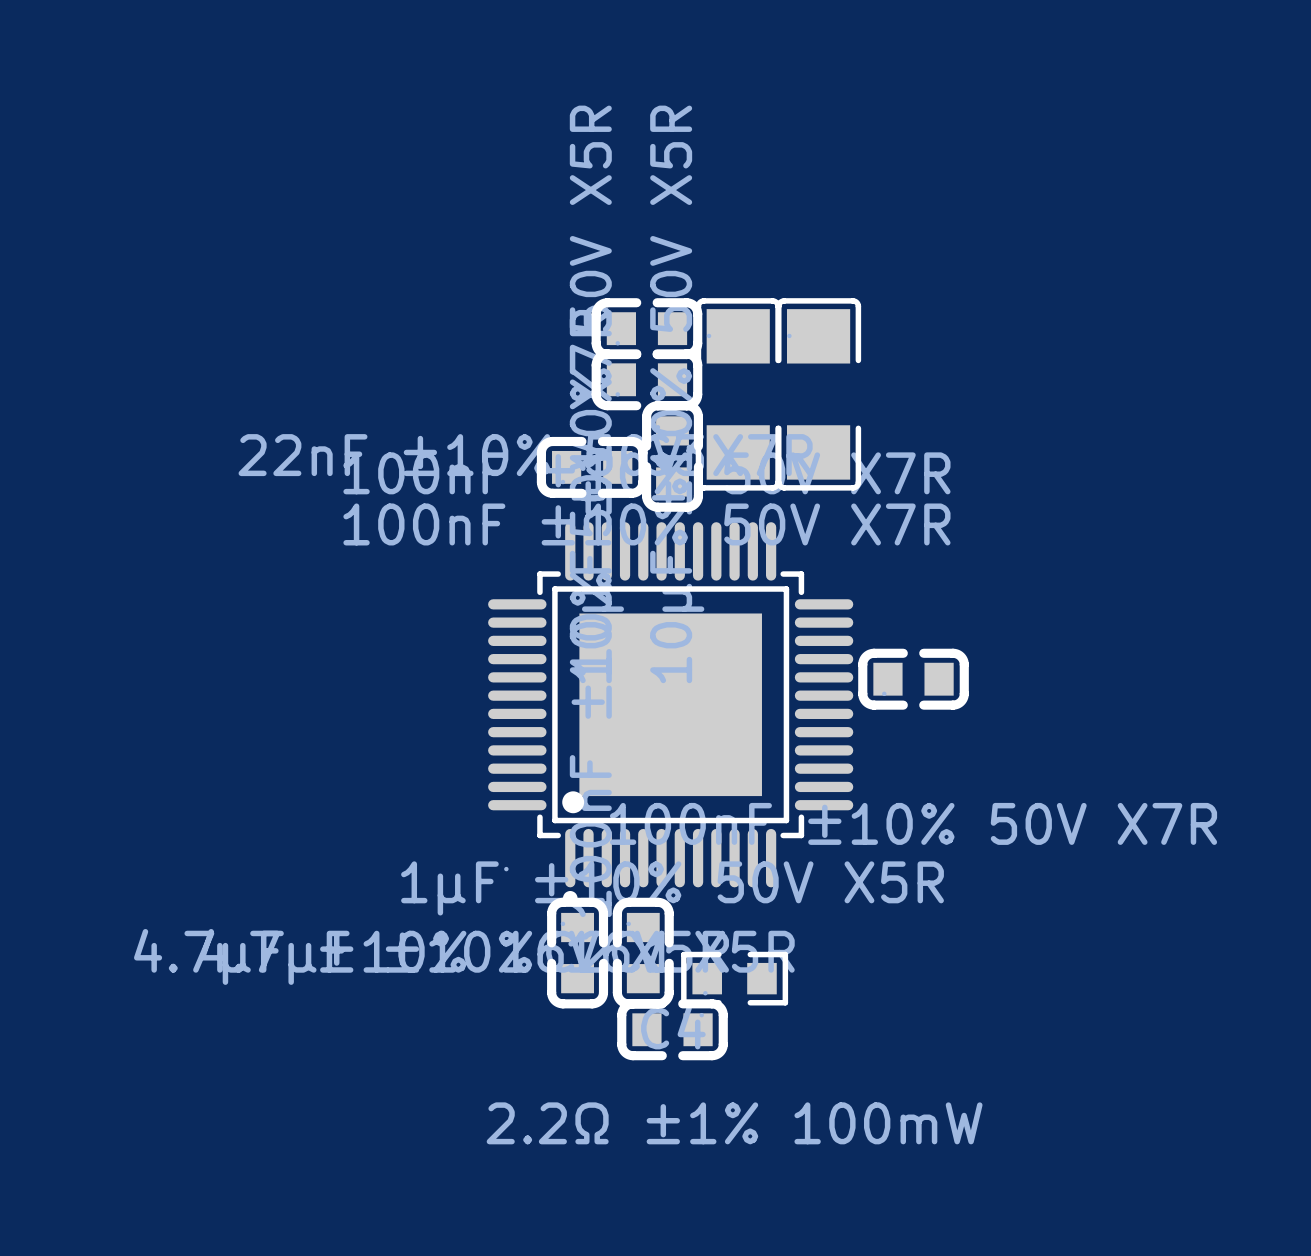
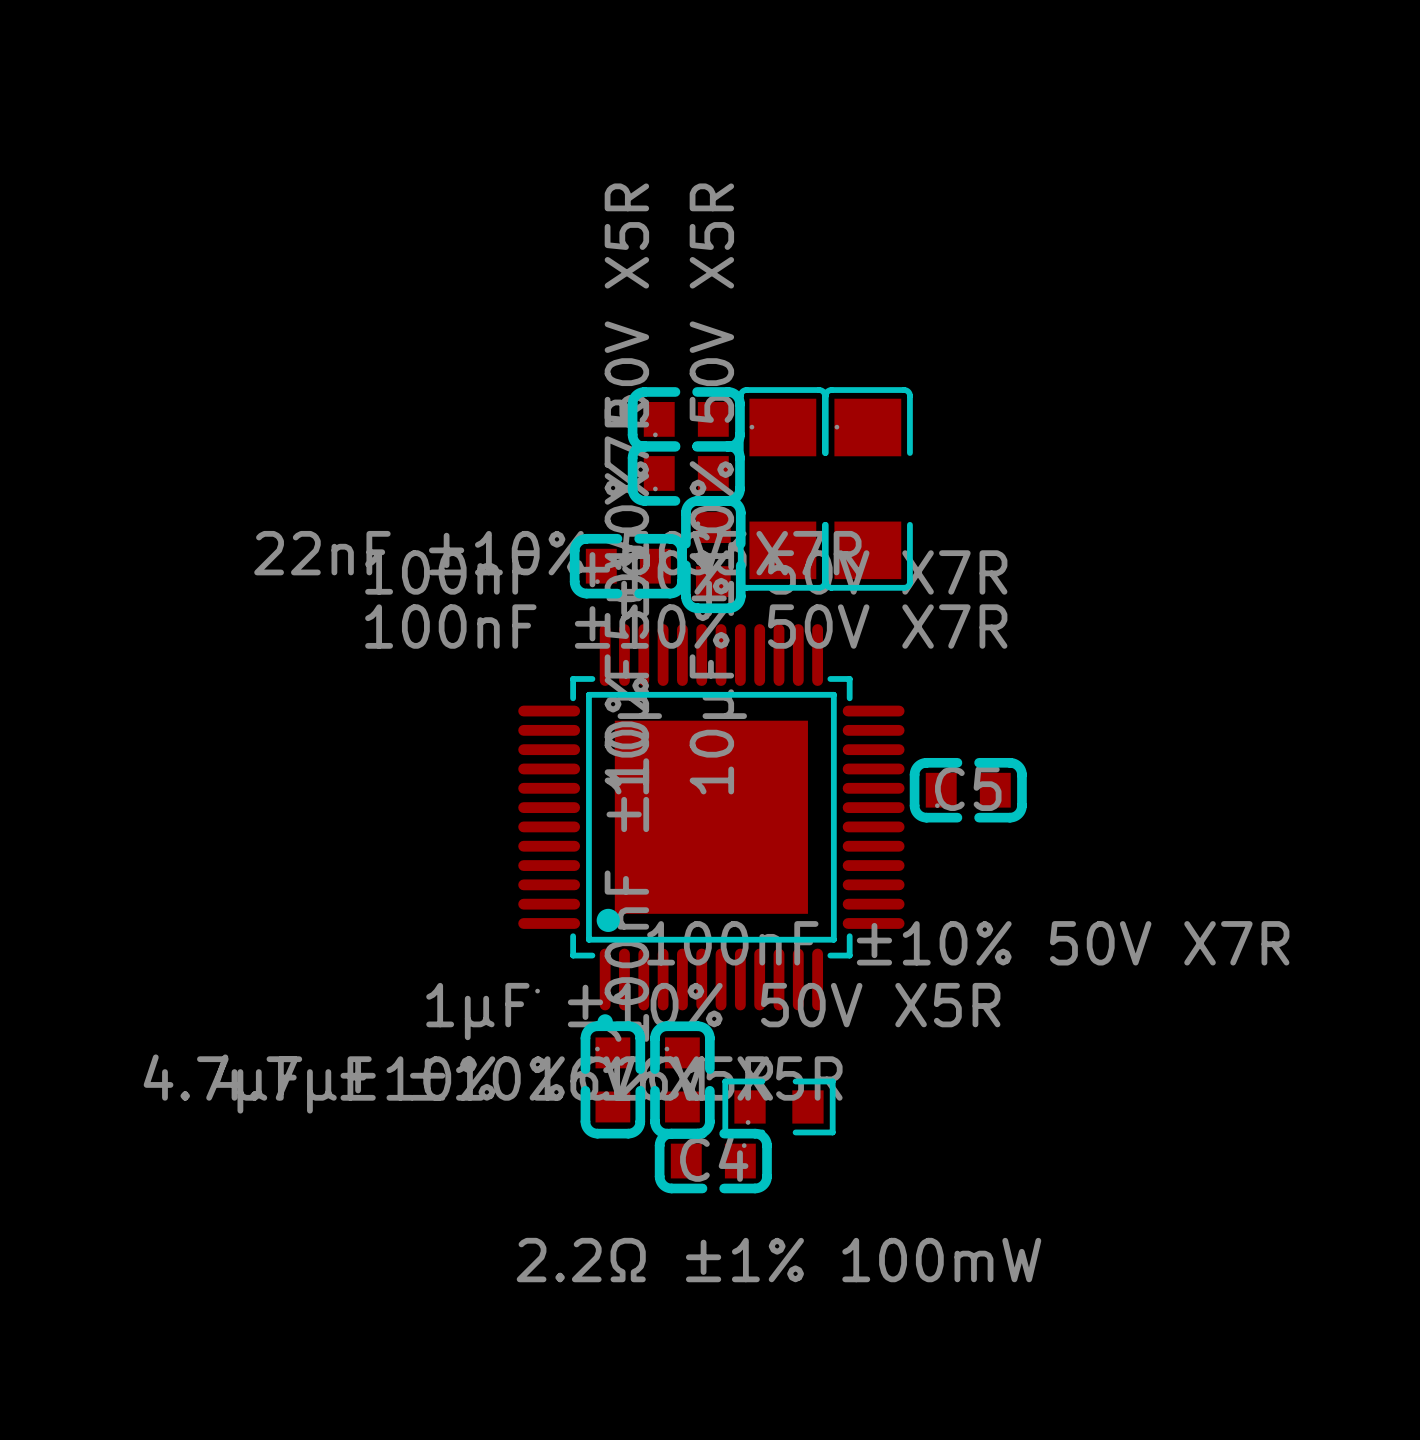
C5 name: none -> C5 (968, 788)

